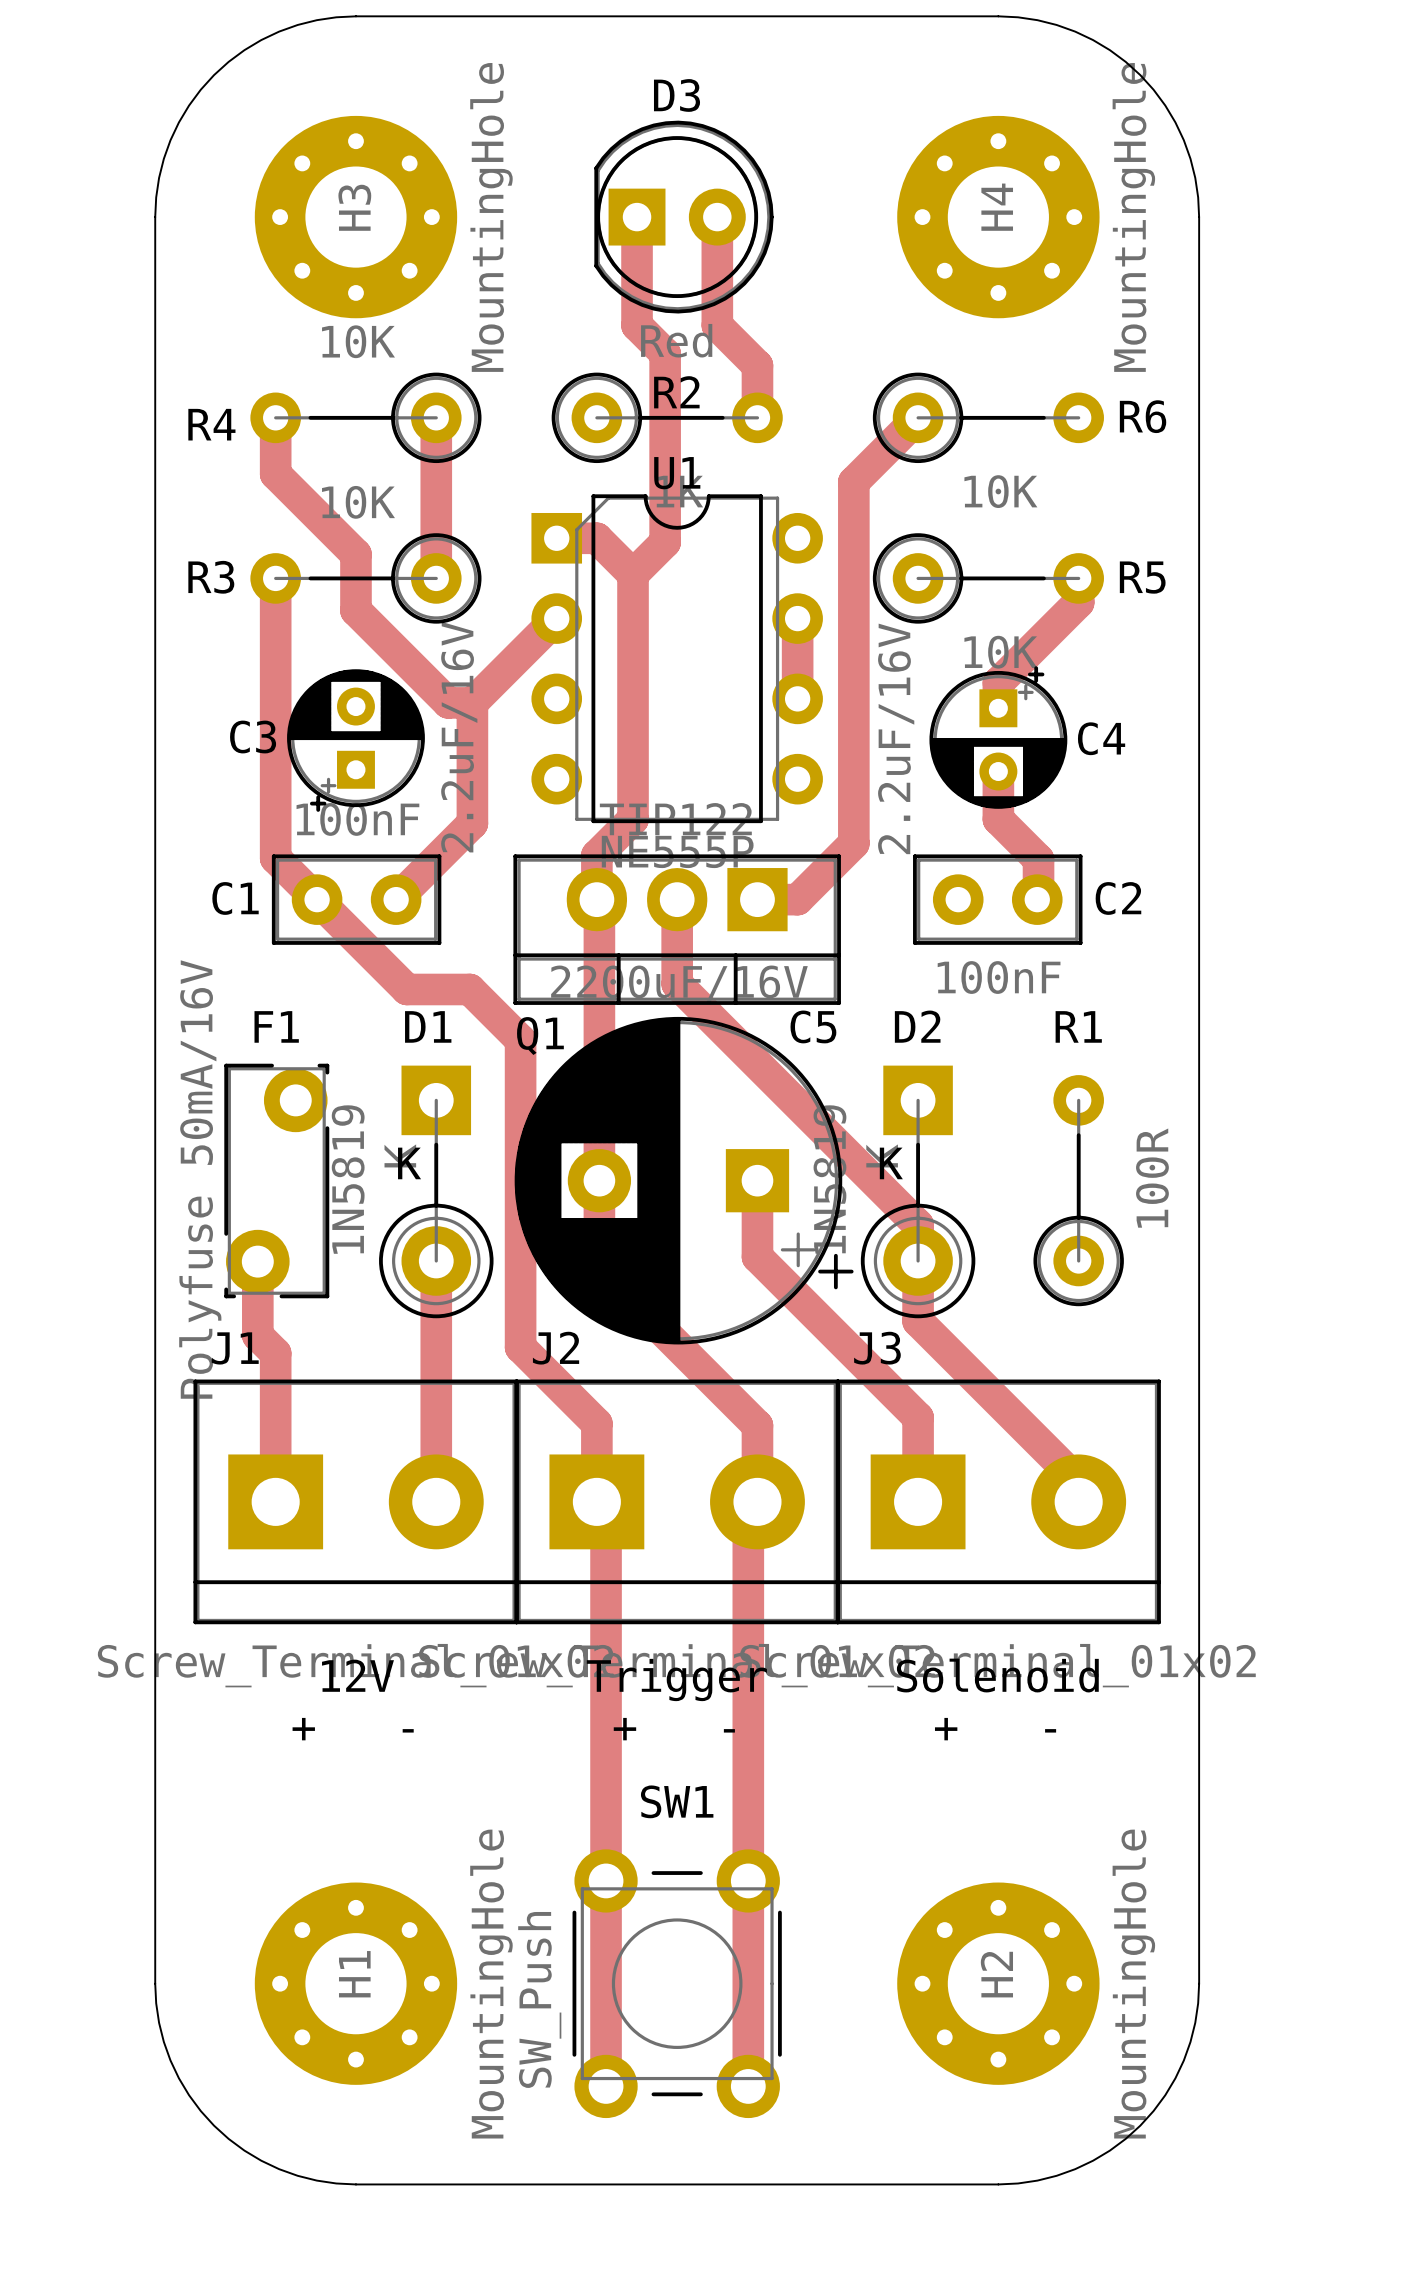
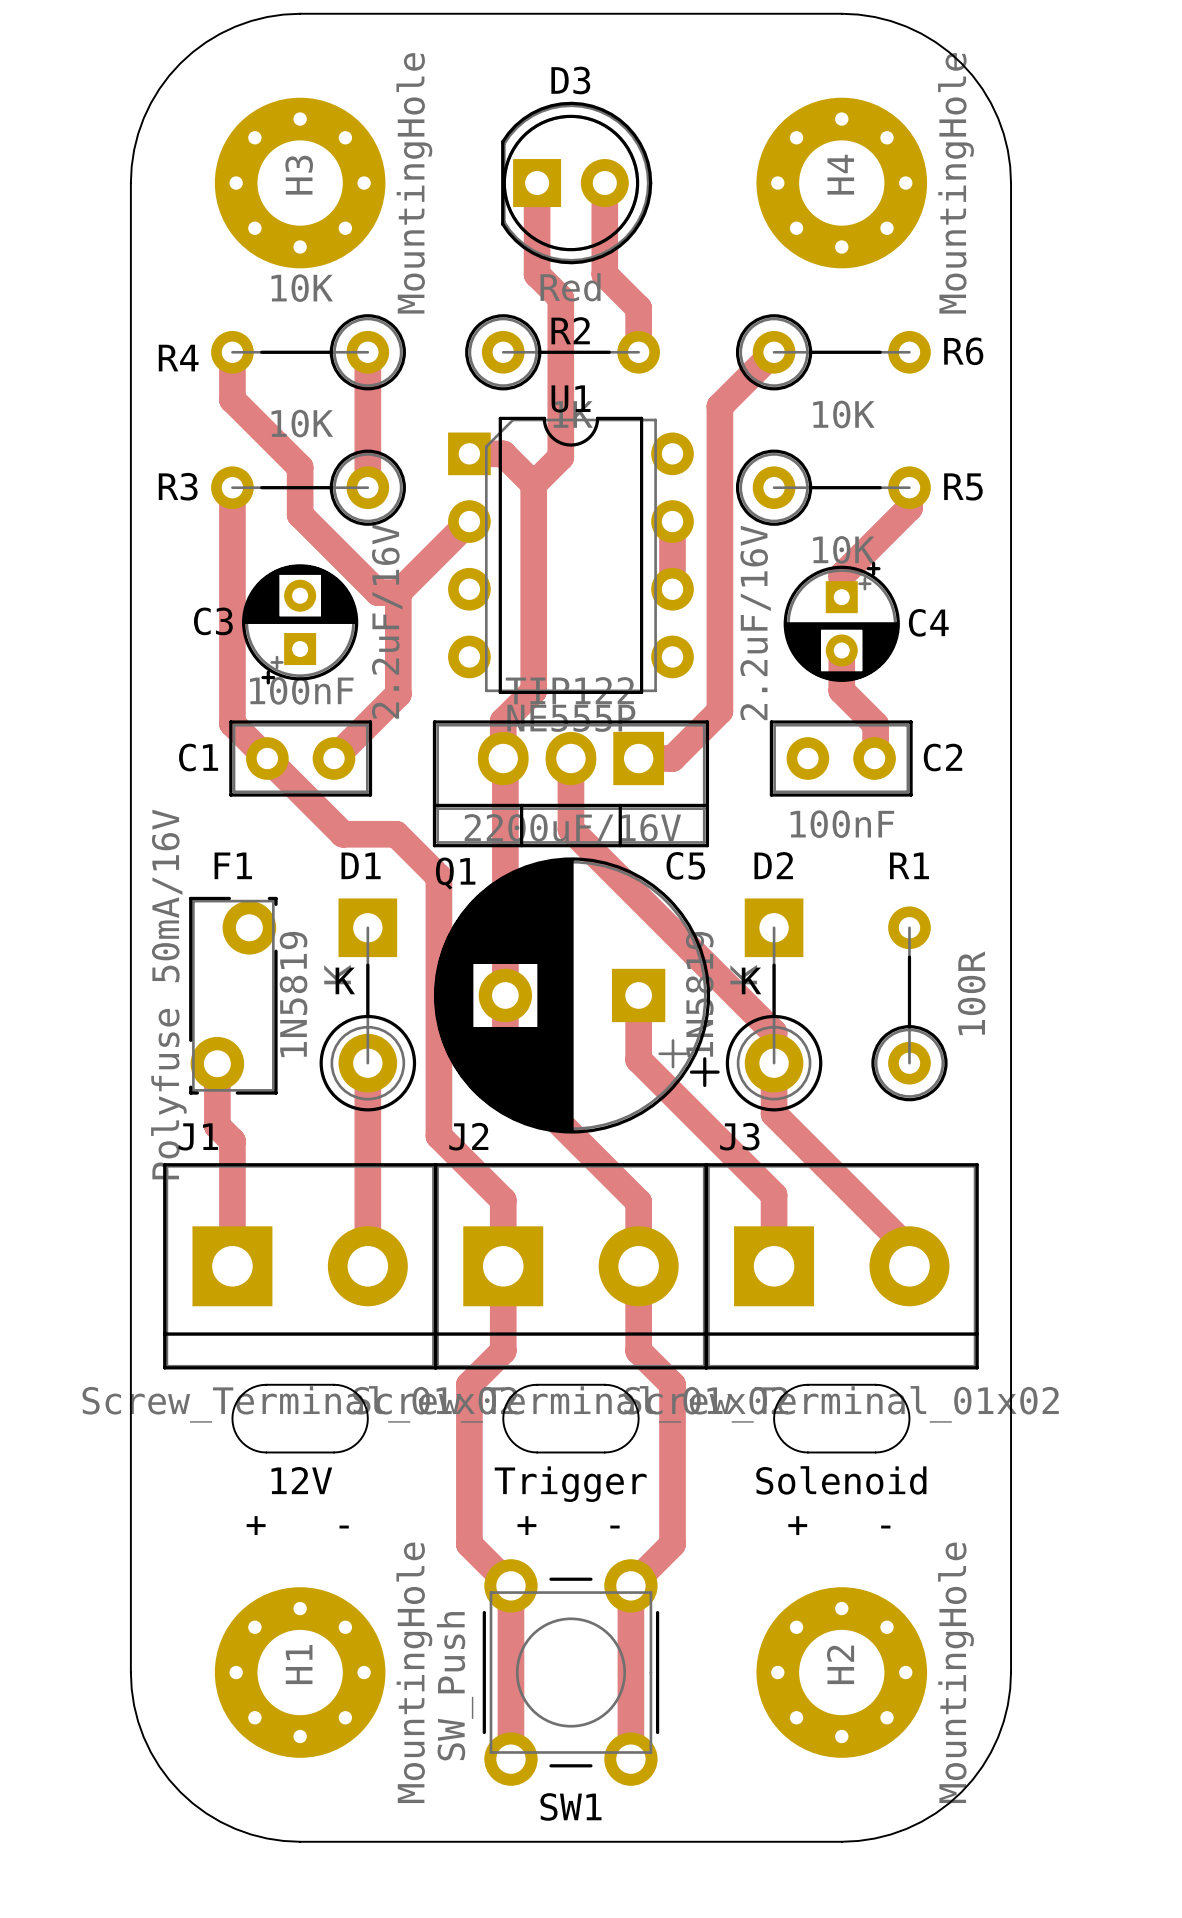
track: (596, 1501) (606, 1511) (606, 1880) -> (503, 1266) (503, 1350) (469, 1384) (469, 1544) (510, 1585)
track: (757, 1501) (748, 1511) (748, 1880) -> (638, 1266) (638, 1350) (672, 1384) (672, 1544) (630, 1585)
text position: 12V (357, 1675) -> 12V (301, 1480)
text position: Solenoid (997, 1675) -> Solenoid (841, 1480)
text position: Trigger (676, 1680) -> Trigger (570, 1484)
board edge: none -> (266, 1452) (257, 1451) (245, 1445) (236, 1435) (233, 1427) (232, 1414) (235, 1405) (239, 1398) (249, 1389) (266, 1384) (338, 1385) (350, 1389) (363, 1401) (367, 1414) (366, 1427) (360, 1439) (350, 1447) (333, 1452) (266, 1452)
board edge: none -> (537, 1452) (528, 1451) (516, 1445) (507, 1435) (504, 1427) (503, 1414) (505, 1405) (510, 1398) (520, 1389) (537, 1384) (609, 1385) (621, 1389) (634, 1401) (638, 1414) (637, 1427) (631, 1439) (621, 1447) (604, 1452) (537, 1452)
board edge: none -> (807, 1452) (799, 1451) (787, 1445) (778, 1435) (775, 1427) (774, 1414) (776, 1405) (781, 1398) (790, 1389) (807, 1384) (880, 1385) (892, 1389) (904, 1401) (909, 1414) (908, 1427) (902, 1439) (892, 1447) (875, 1452) (807, 1452)
text position: + - (353, 1729) -> + - (297, 1525)
text position: + - (674, 1729) -> + - (568, 1525)
text position: + - (995, 1729) -> + - (839, 1525)
SW1 name position: SW1 (677, 1801) -> SW1 (570, 1806)

